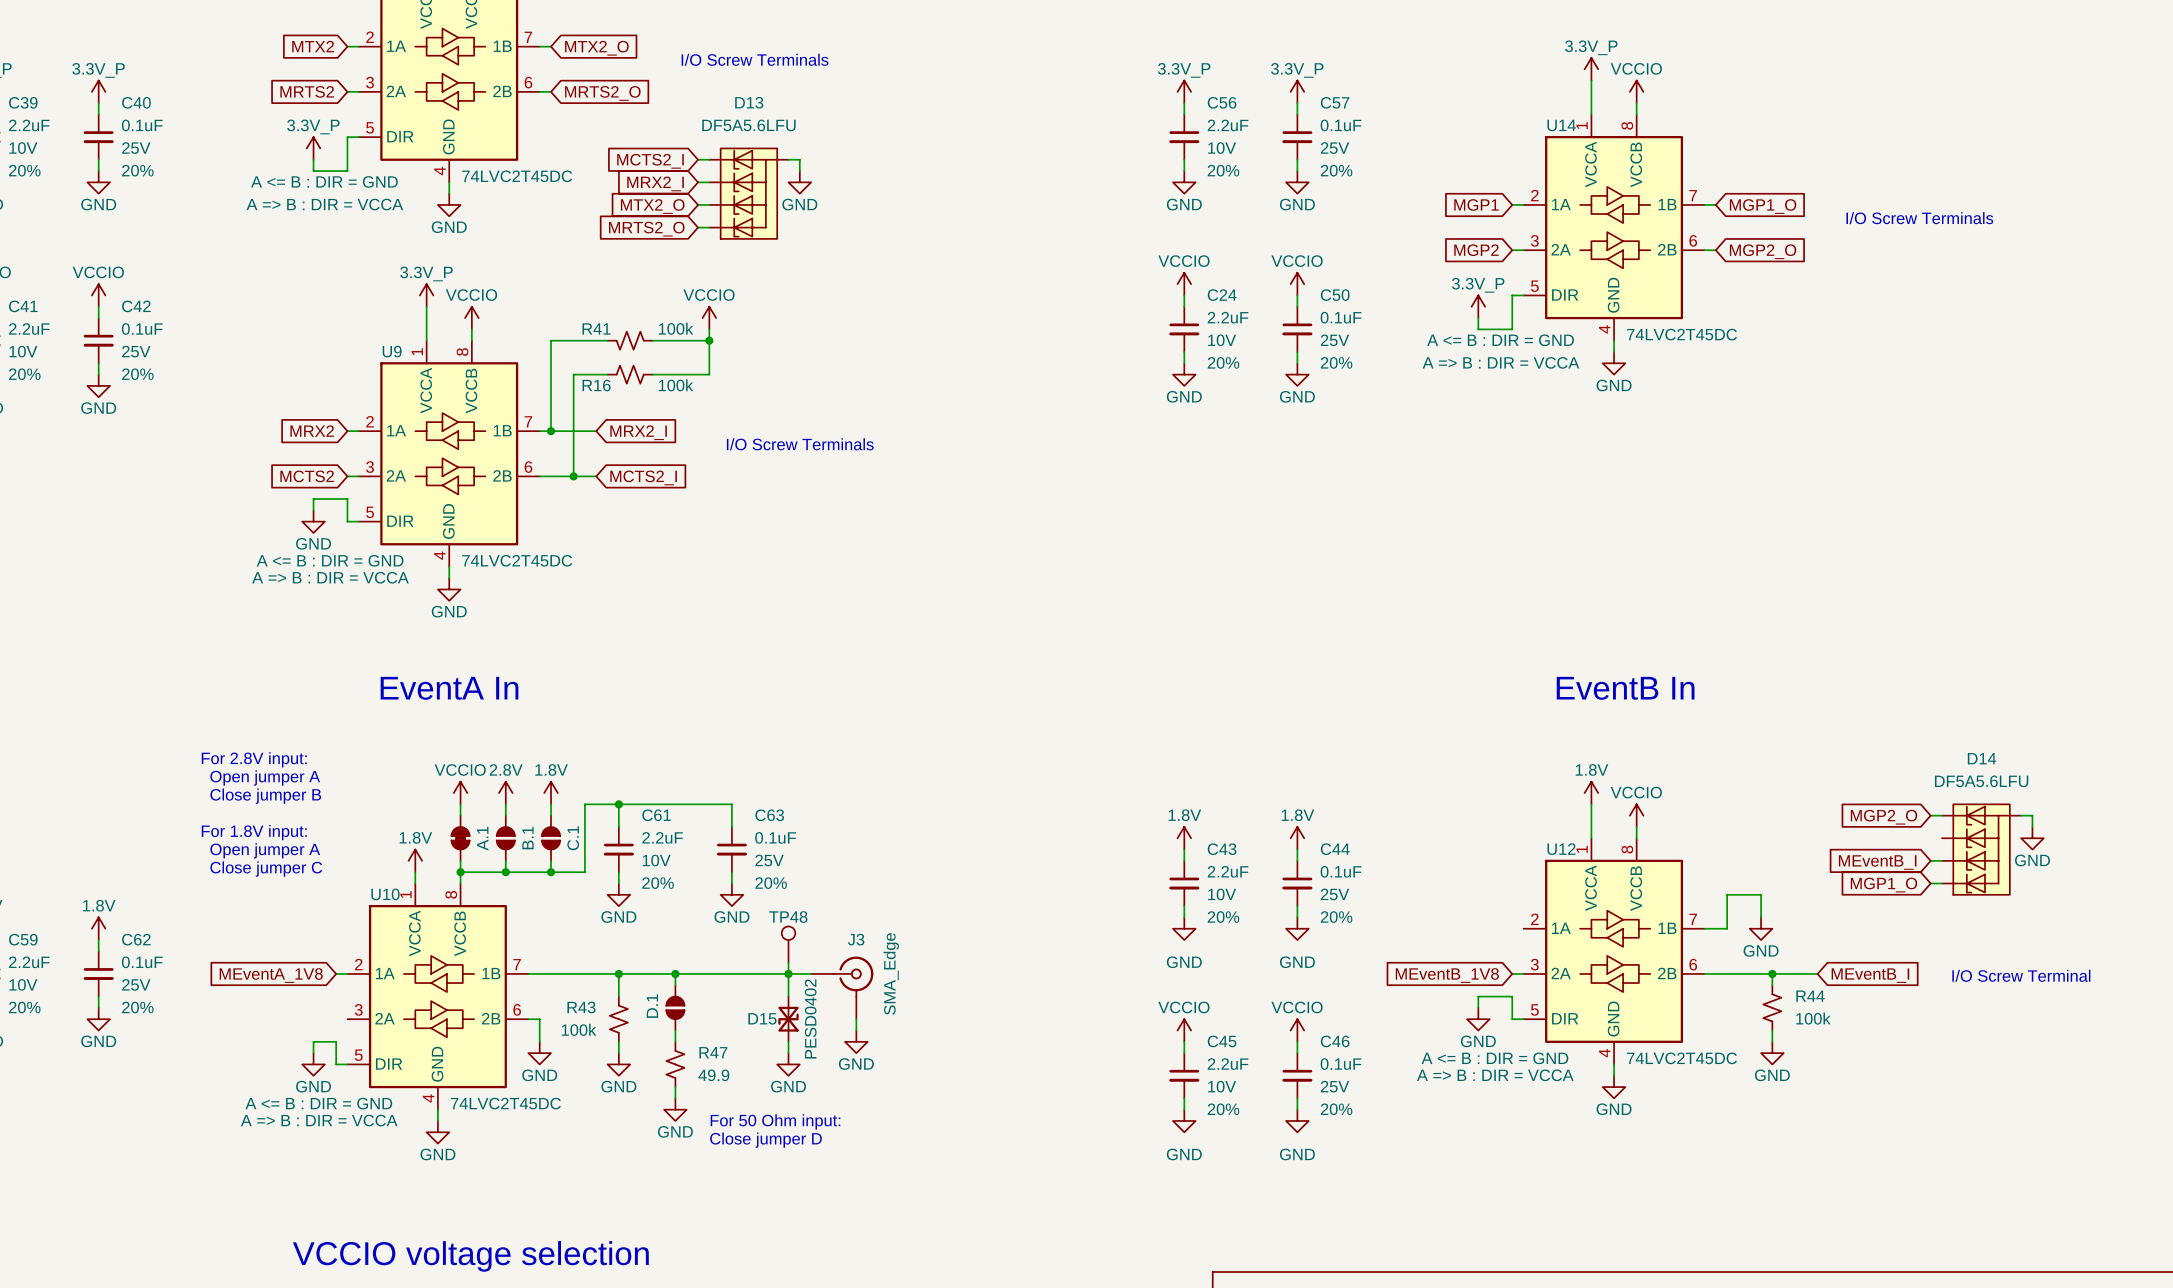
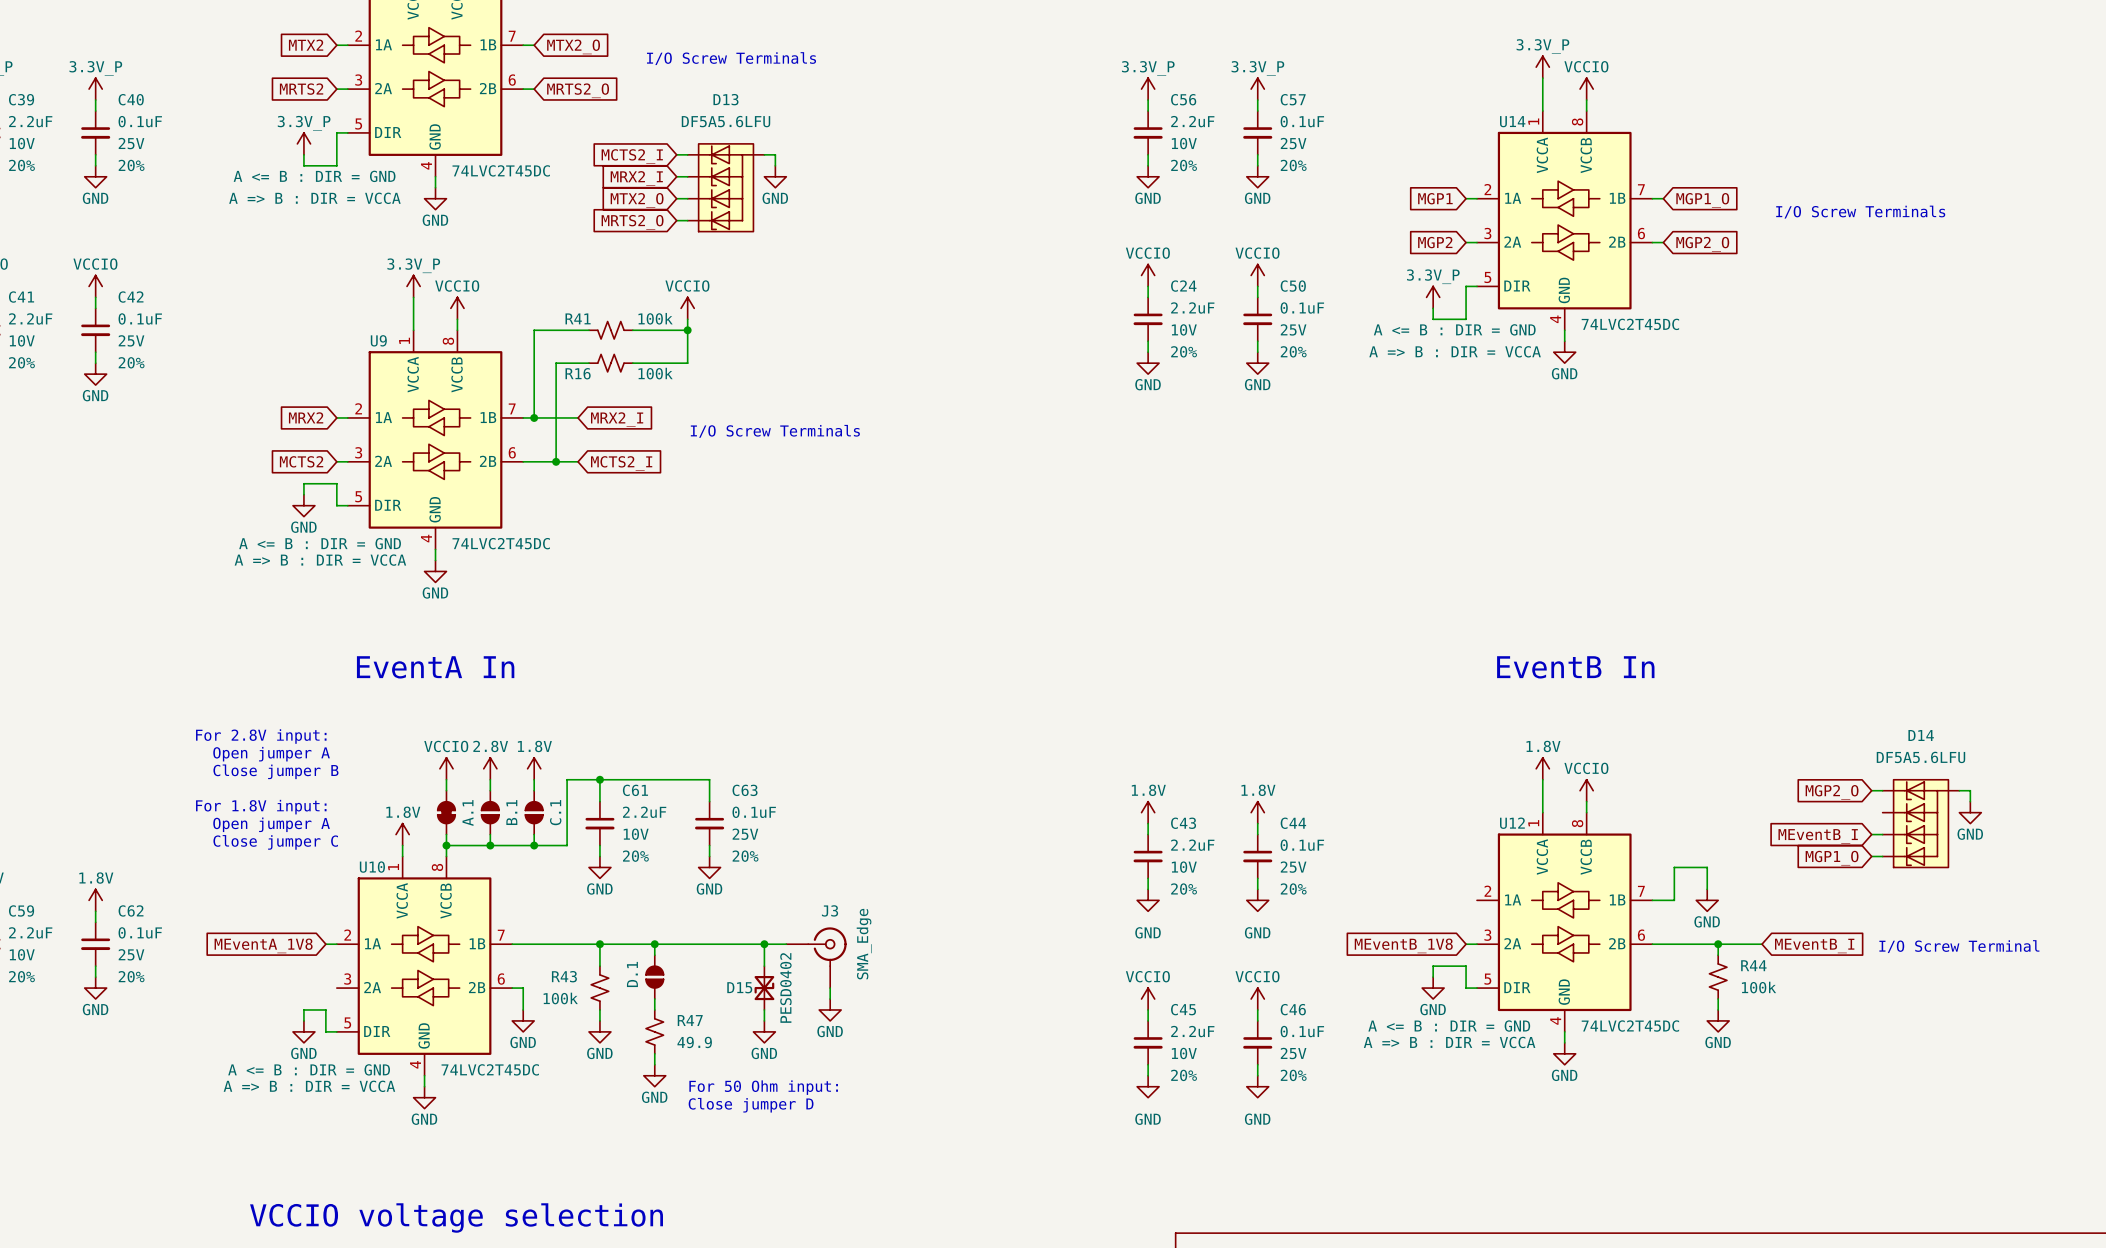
TP48: (788, 944) -> none
wire: (788, 962) (788, 973) -> none

